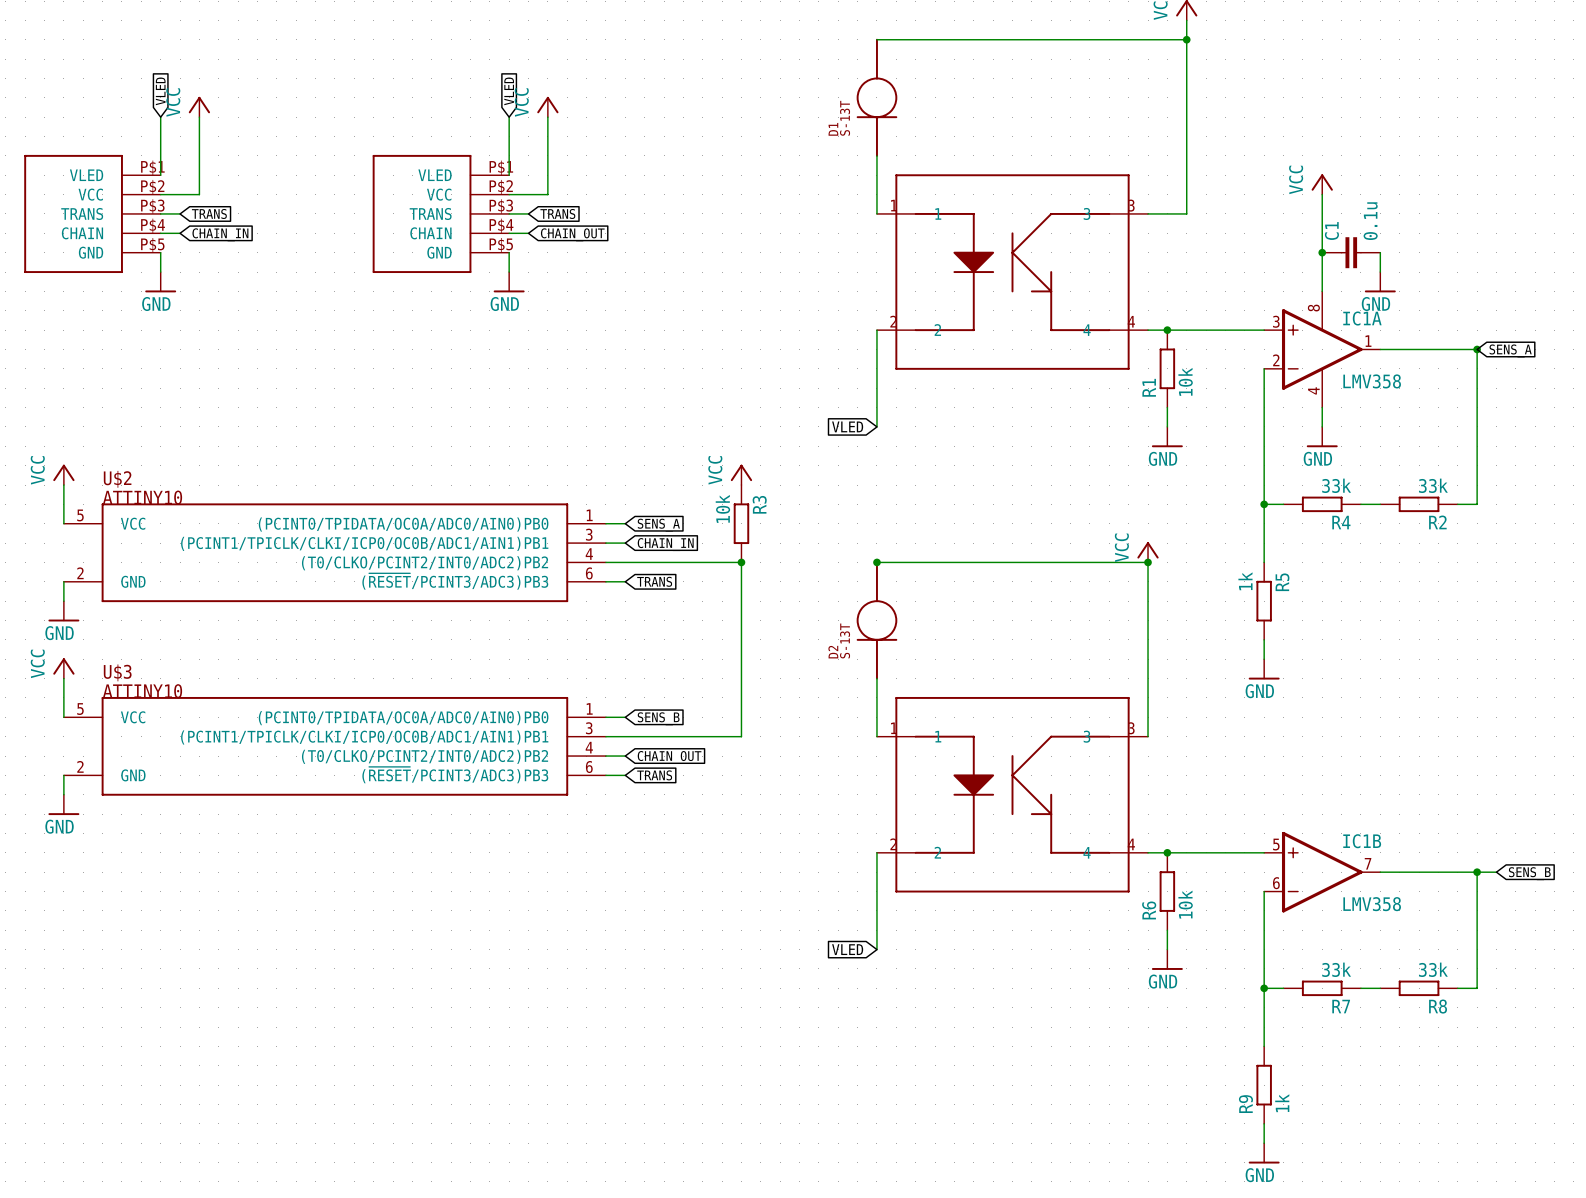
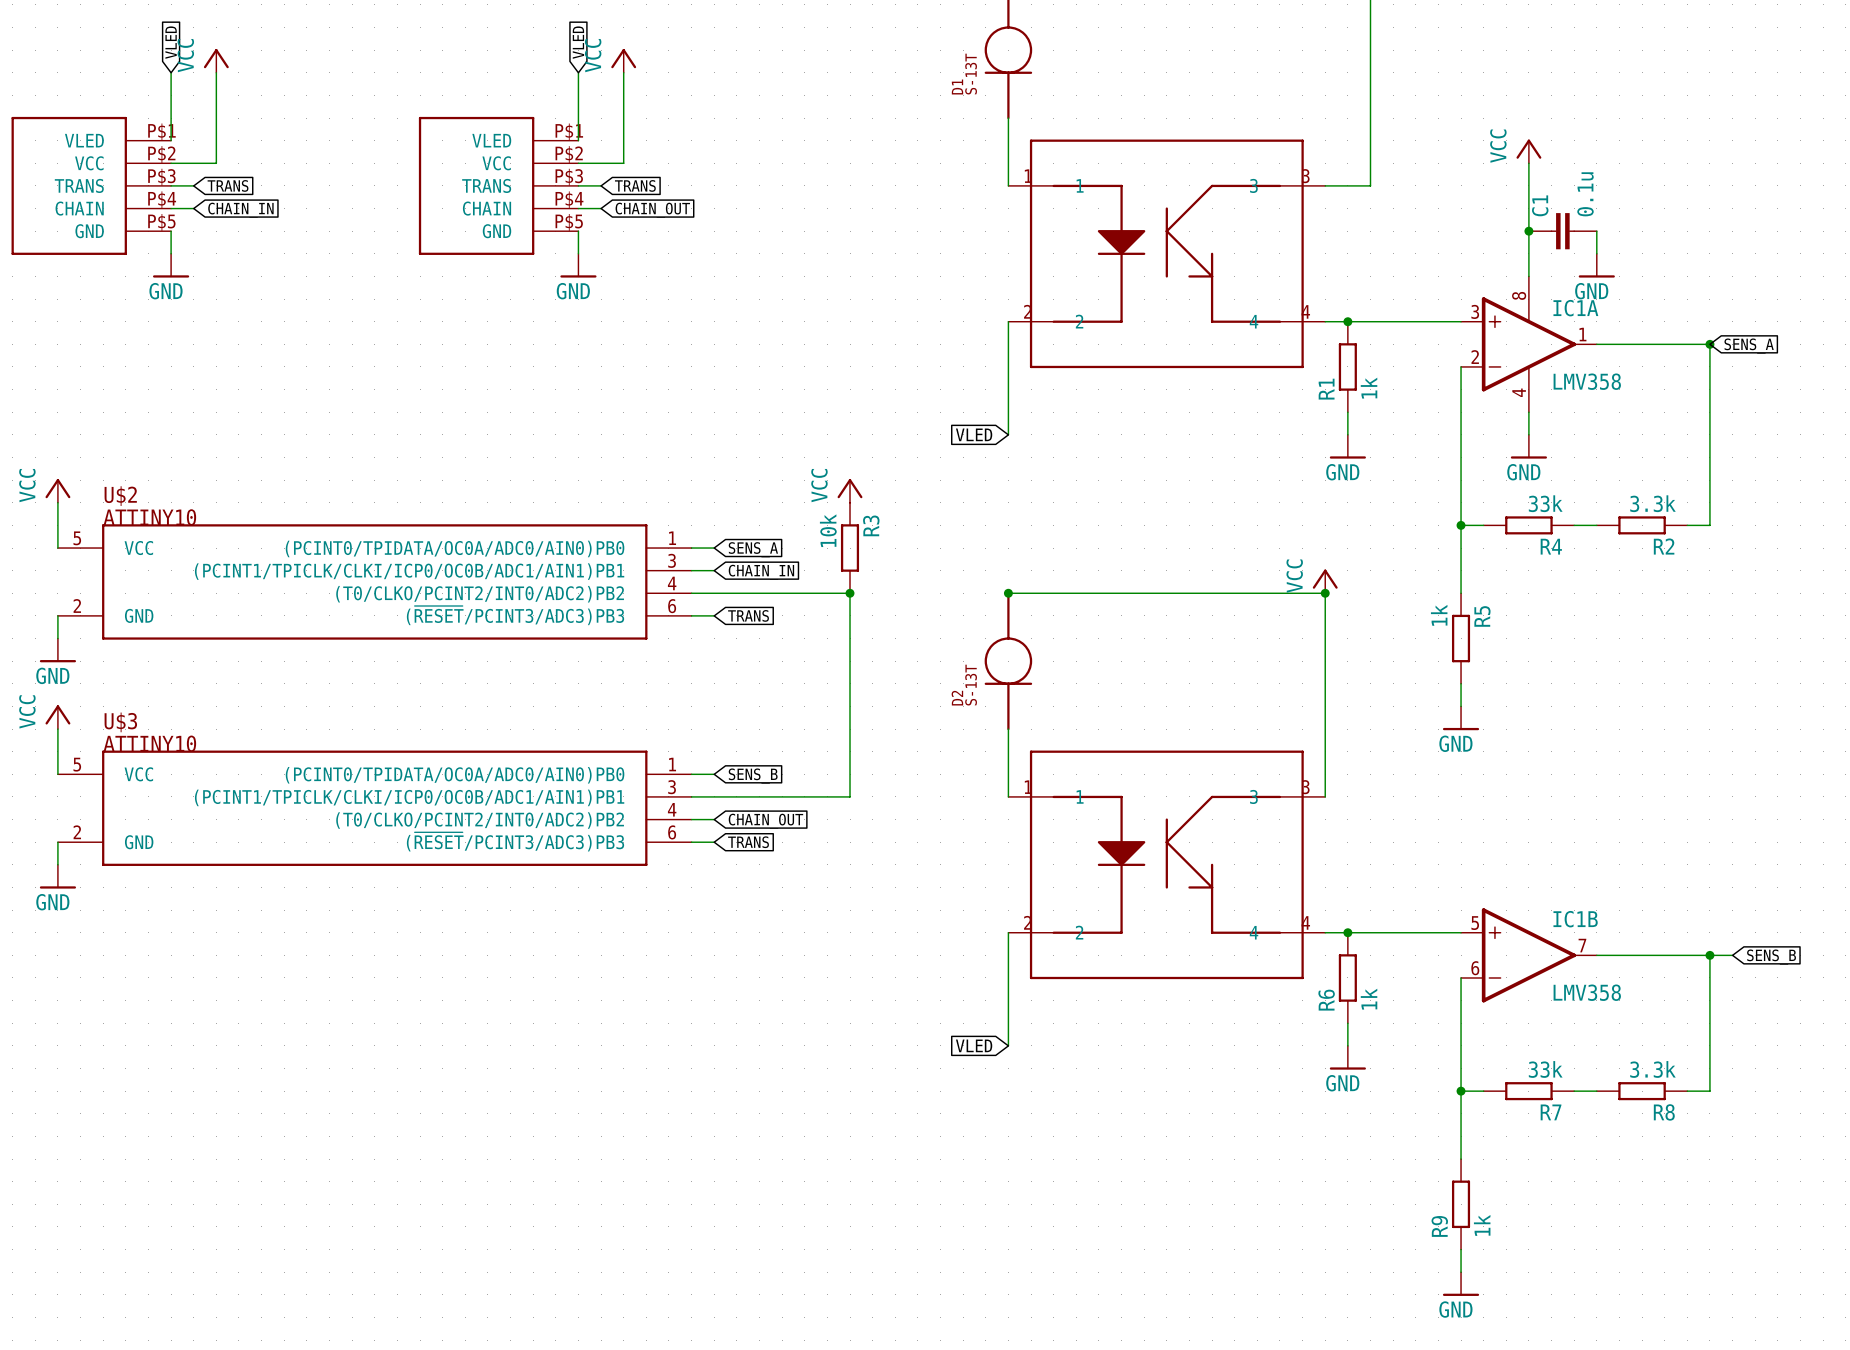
R1 value: 10k (1185, 381) -> 1k (1369, 388)
R2 value: 33k (1433, 485) -> 3.3k (1652, 503)
R6 value: 10k (1185, 904) -> 1k (1369, 999)
R8 value: 33k (1433, 969) -> 3.3k (1652, 1069)

